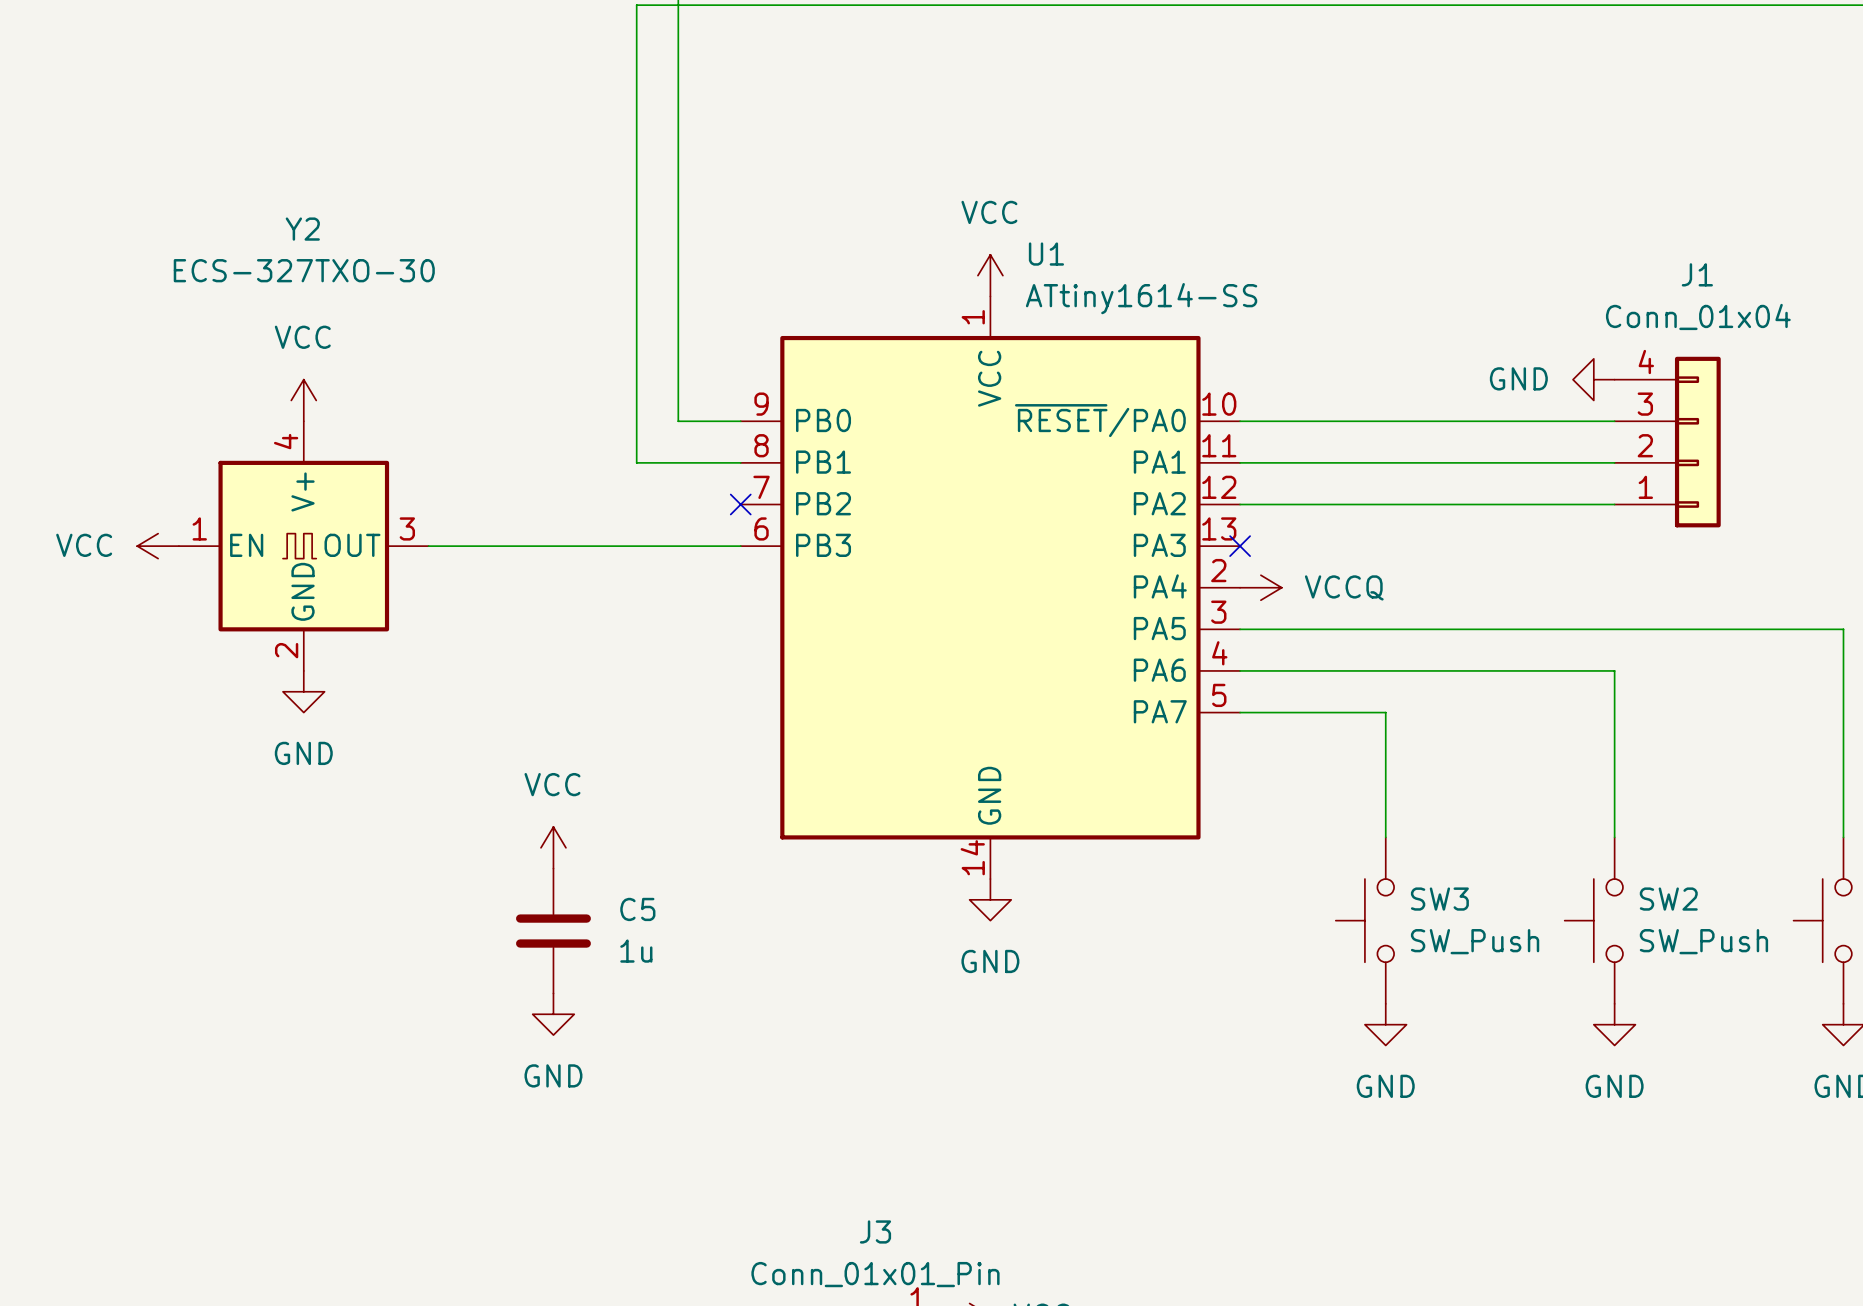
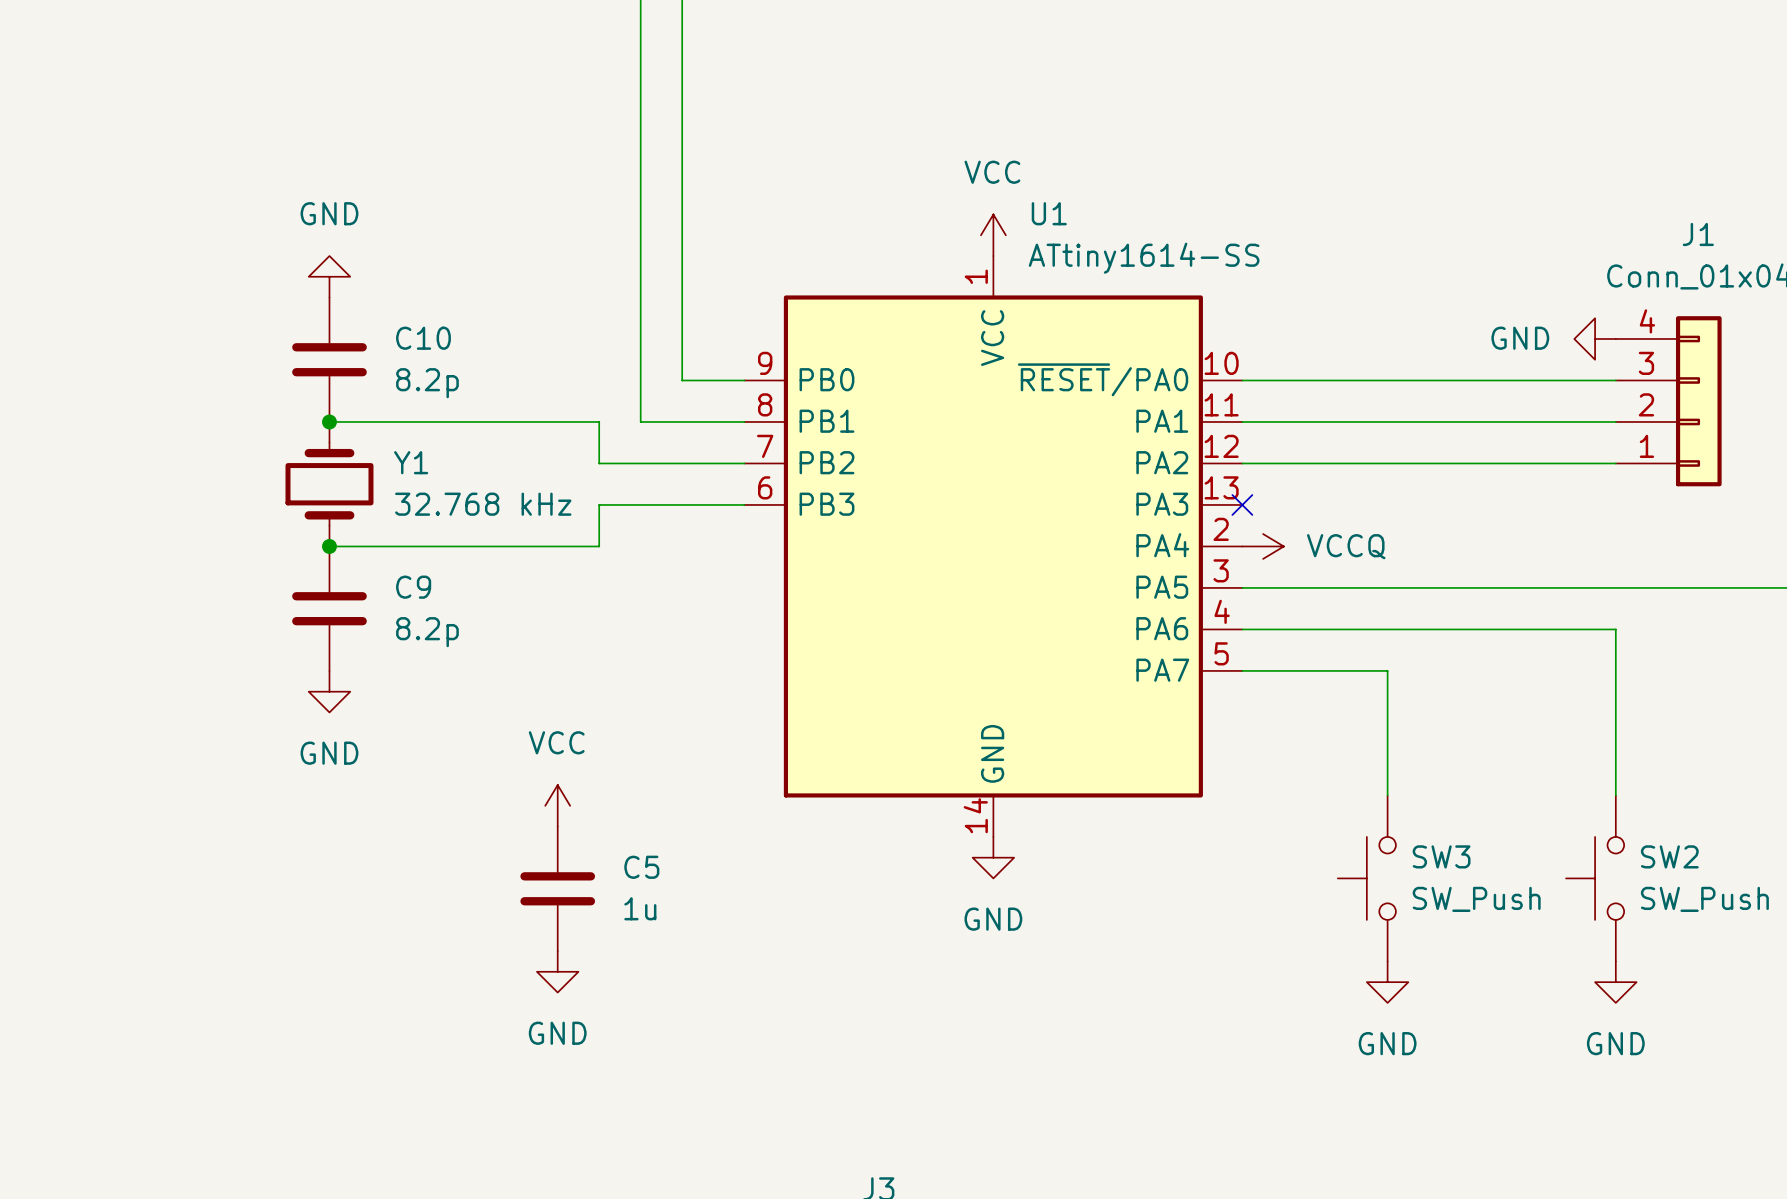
power symbol: none -> GND (329, 276)
power symbol: VCC (303, 400) -> none
C10: none -> 8.2p (329, 359)
wire: none -> (329, 421) (599, 421) (599, 463) (744, 463)
junction: none -> (329, 421)
no-connect mark: (740, 504) -> none
Y1: none -> 32.768 kHz (329, 484)
power symbol: VCC (158, 546) -> none
Y2: ECS-327TXO-30 (303, 546) -> none
wire: (428, 546) (595, 546) -> (329, 546) (599, 546) (599, 504)
junction: none -> (329, 546)
C9: none -> 8.2p (329, 608)
power symbol position: GND (303, 691) -> GND (329, 691)

